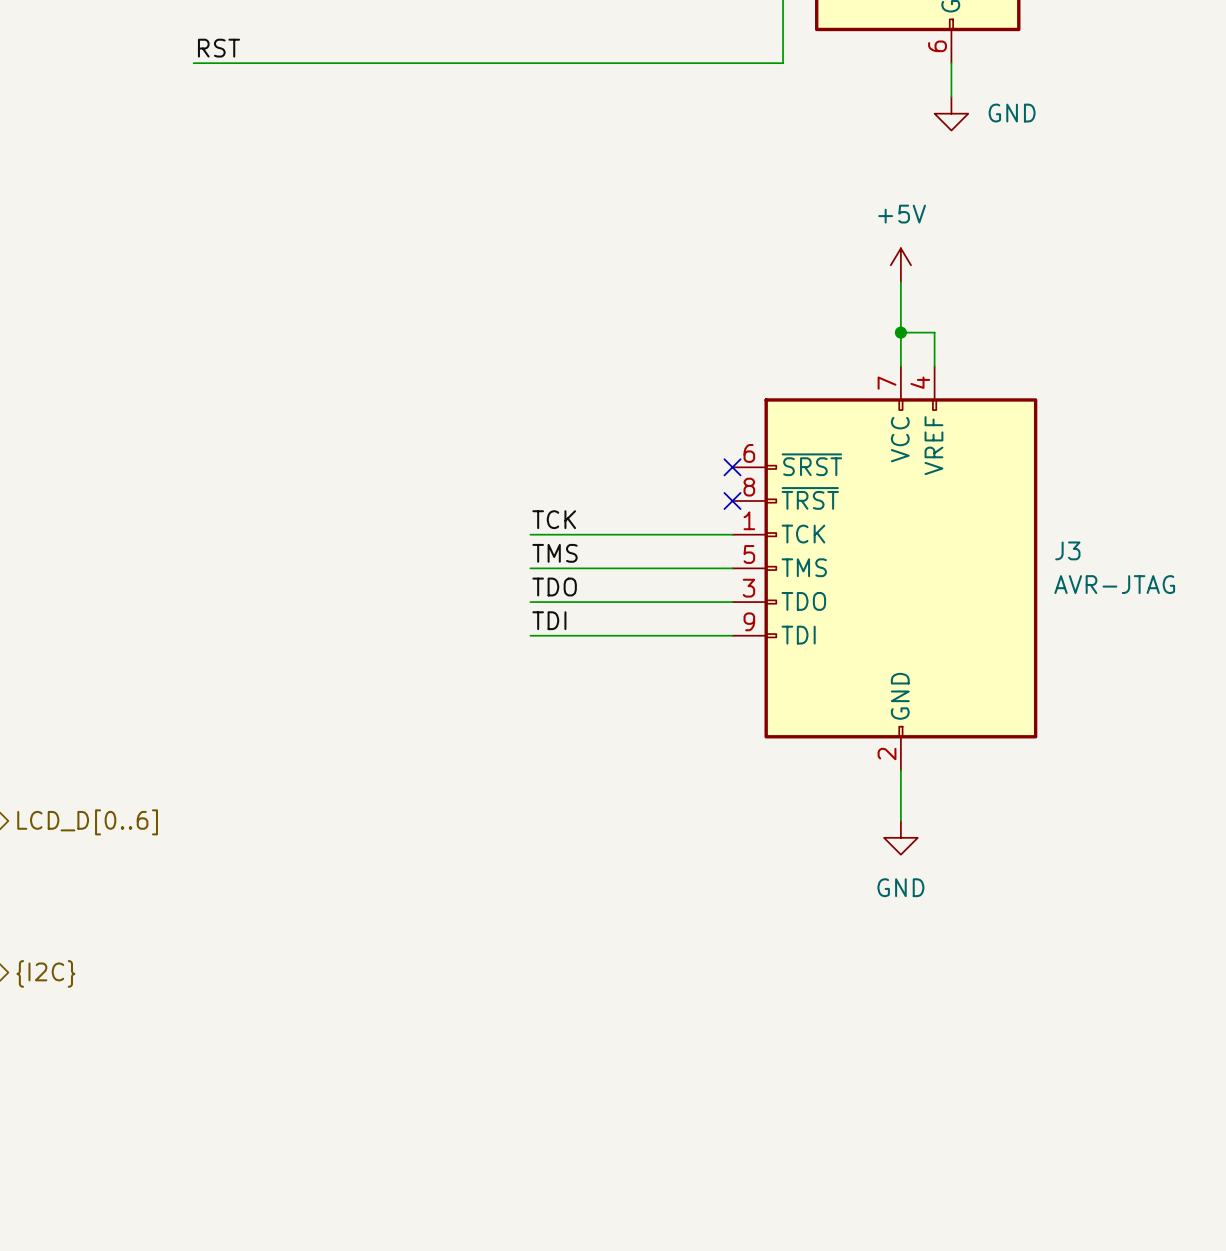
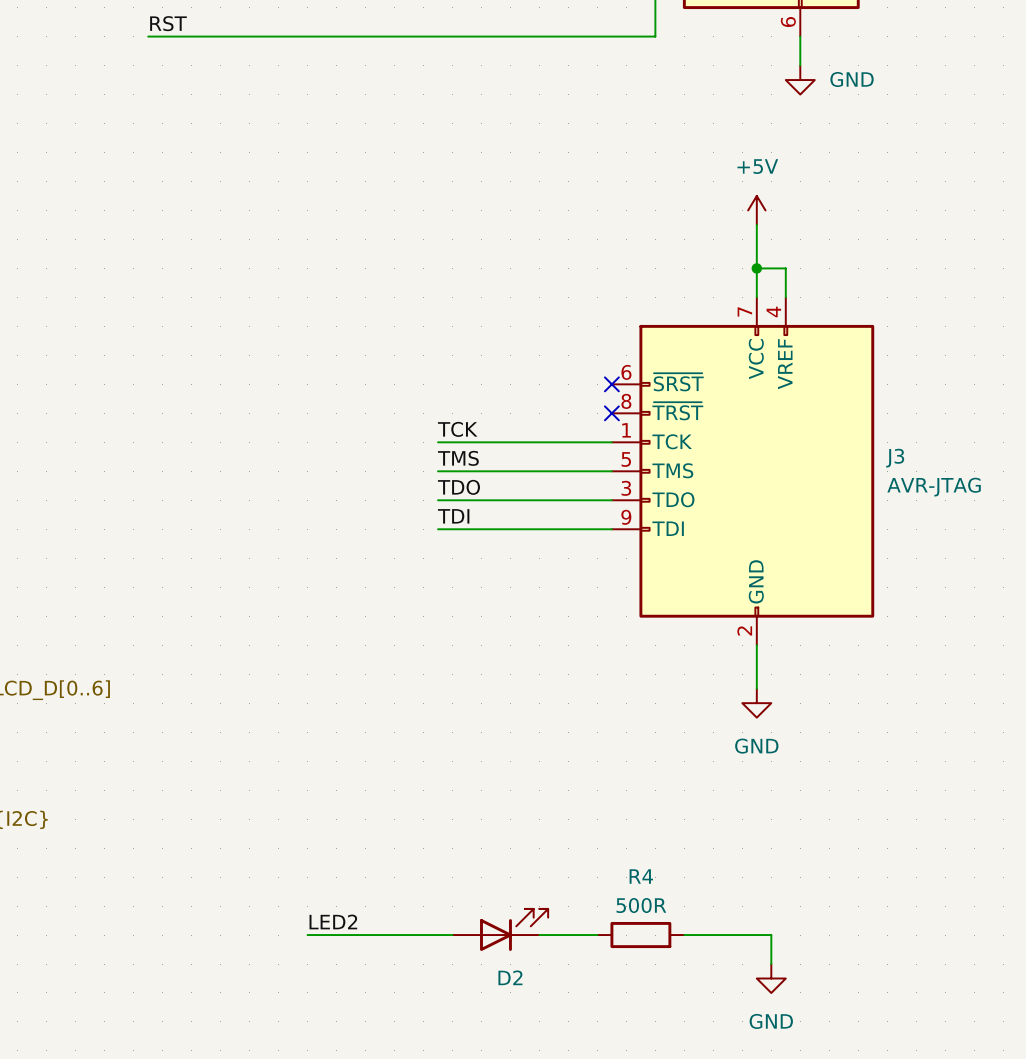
label: none -> LED2 (333, 921)
D2: none -> (500, 929)
wire: none -> (307, 935) (452, 935)
wire: none -> (539, 935) (597, 935)
R4: none -> 500R (640, 935)
wire: none -> (684, 935) (771, 935) (771, 964)
power symbol: none -> GND (771, 978)

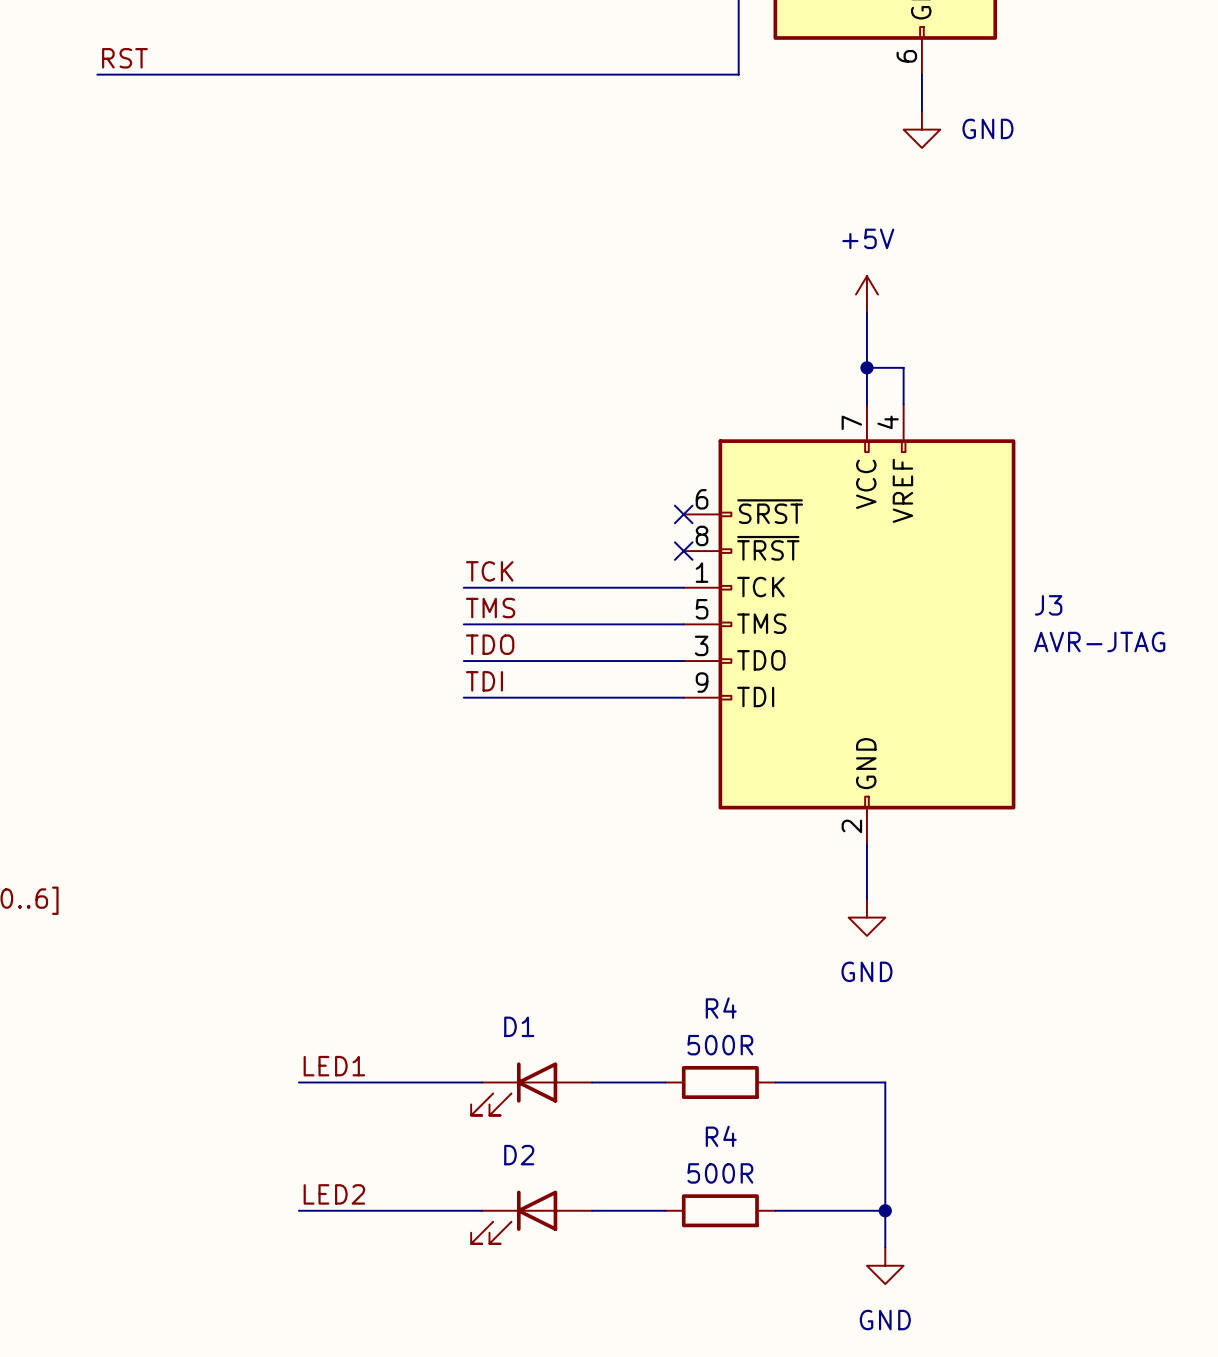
label: none -> LED1 (334, 1066)
wire: none -> (298, 1082) (482, 1082)
wire: none -> (592, 1082) (665, 1082)
R4: none -> 500R (720, 1082)
wire: none -> (775, 1082) (885, 1082) (885, 1210)
D1: none -> (531, 1088)
D2 rotation: 0° (514, 929) -> 180° (514, 1217)
junction: none -> (885, 1210)

